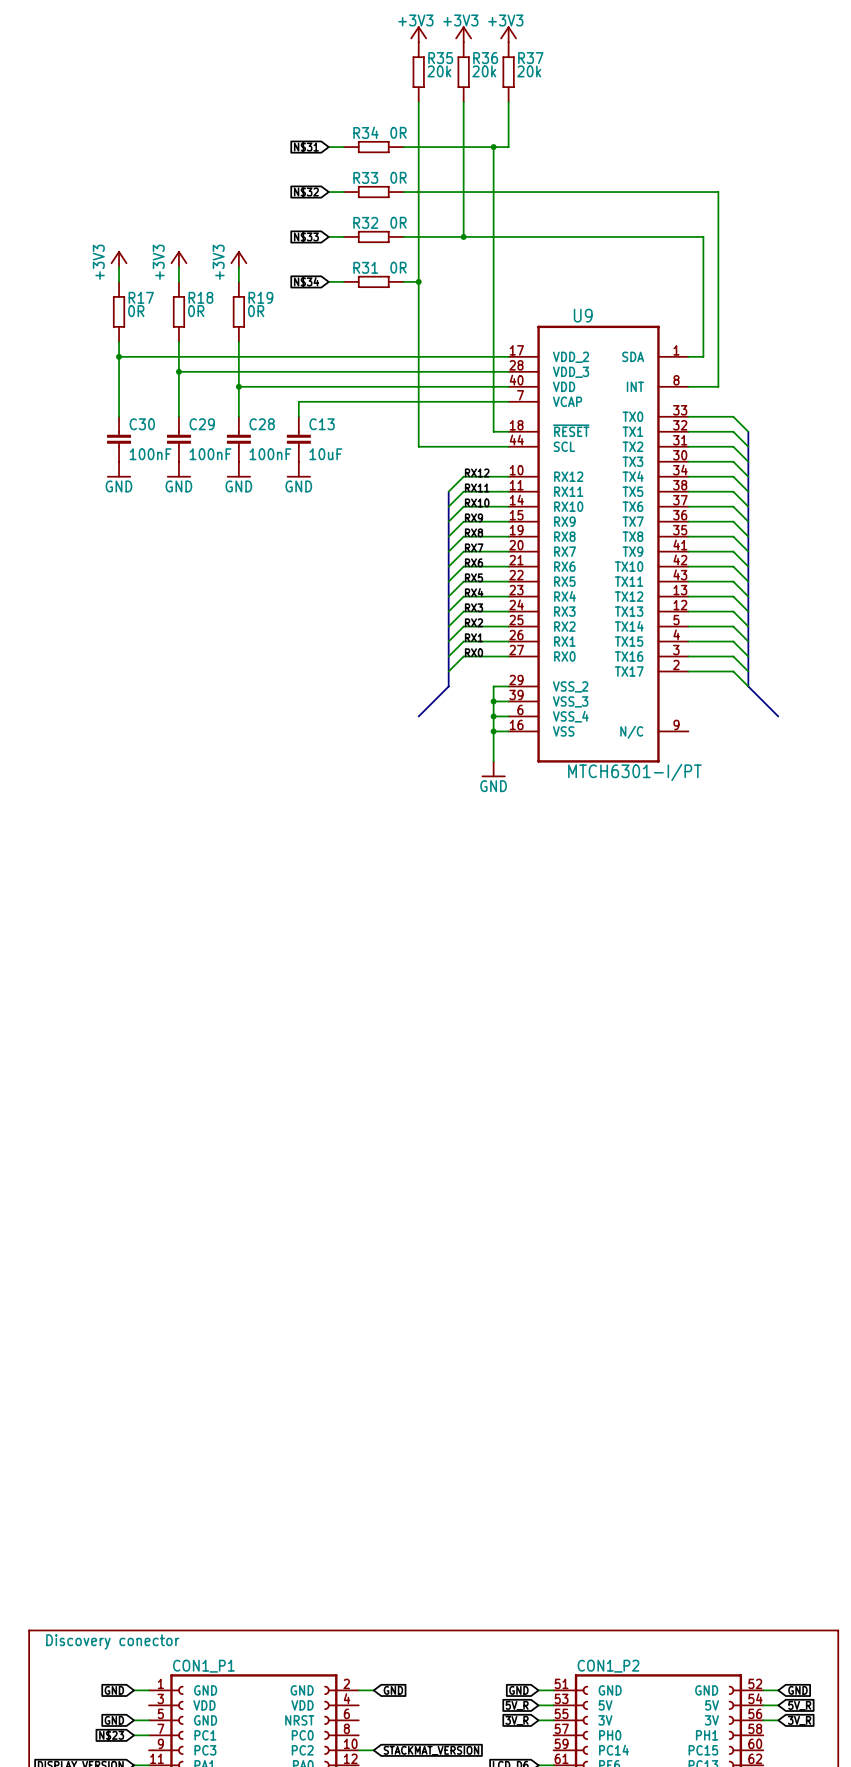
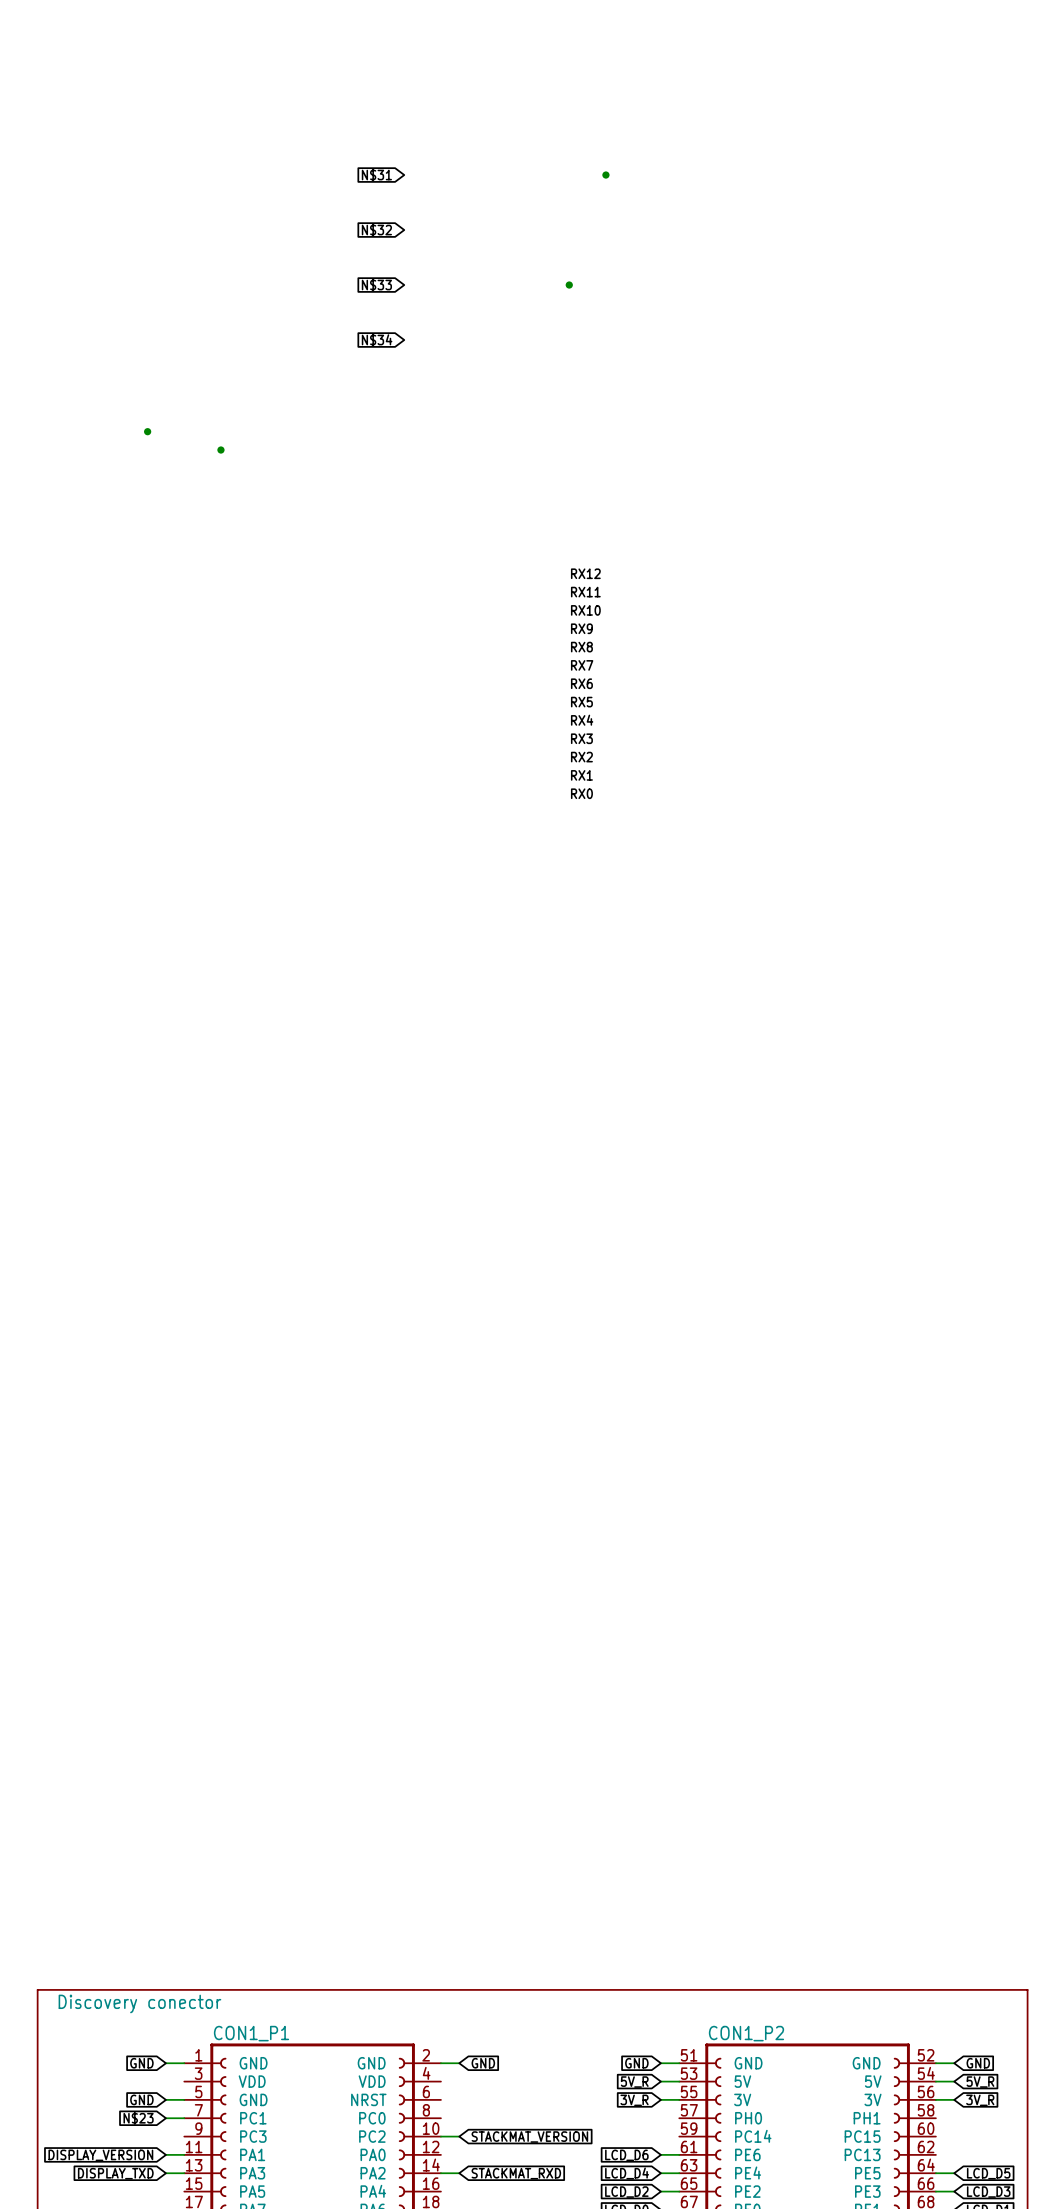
power symbol: +3V3 (418, 34) -> none
power symbol: +3V3 (463, 34) -> none
power symbol: +3V3 (508, 34) -> none
R35: 20k (418, 72) -> none
R36: 20k (463, 72) -> none
R37: 20k (508, 72) -> none
wire: (418, 102) (418, 446) (508, 446) -> none
wire: (463, 102) (463, 236) -> none
wire: (508, 102) (508, 147) (403, 147) -> none
wire: (328, 147) (343, 147) -> none
R34: 0R (373, 147) -> none
wire: (493, 147) (493, 431) (508, 431) -> none
wire: (328, 192) (343, 192) -> none
R33: 0R (373, 192) -> none
wire: (403, 192) (718, 192) (718, 386) (688, 386) -> none
wire: (328, 236) (343, 236) -> none
R32: 0R (373, 236) -> none
wire: (403, 236) (703, 236) (703, 356) (688, 356) -> none
power symbol: +3V3 (119, 259) -> none
power symbol: +3V3 (178, 259) -> none
power symbol: +3V3 (238, 259) -> none
wire: (119, 266) (119, 281) -> none
wire: (178, 266) (178, 281) -> none
wire: (238, 266) (238, 281) -> none
wire: (328, 281) (343, 281) -> none
R31: 0R (373, 281) -> none
wire: (403, 281) (418, 281) -> none
junction: (418, 281) -> none
R17: 0R (119, 311) -> none
R18: 0R (178, 311) -> none
R19: 0R (238, 311) -> none
wire: (119, 341) (119, 416) -> none
wire: (178, 341) (178, 416) -> none
wire: (238, 341) (238, 416) -> none
wire: (119, 356) (508, 356) -> none
wire: (178, 371) (508, 371) -> none
wire: (238, 386) (508, 386) -> none
junction: (238, 386) -> none
wire: (508, 401) (298, 401) (298, 416) -> none
wire: (688, 416) (733, 416) (748, 431) -> none
wire: (688, 431) (733, 431) (748, 446) -> none
bus: (748, 431) (748, 686) (778, 716) -> none
C30: 100nF (119, 439) -> none
C29: 100nF (178, 439) -> none
C28: 100nF (238, 439) -> none
C13: 10uF (298, 439) -> none
wire: (688, 446) (733, 446) (748, 461) -> none
wire: (688, 461) (733, 461) (748, 476) -> none
power symbol: GND (119, 469) -> none
power symbol: GND (178, 469) -> none
power symbol: GND (238, 469) -> none
power symbol: GND (298, 469) -> none
wire: (508, 476) (463, 476) (448, 491) -> none
wire: (688, 476) (733, 476) (748, 491) -> none
bus: (448, 491) (448, 686) (418, 716) -> none
wire: (508, 491) (463, 491) (448, 506) -> none
wire: (688, 491) (733, 491) (748, 506) -> none
wire: (508, 506) (463, 506) (448, 521) -> none
wire: (688, 506) (733, 506) (748, 521) -> none
wire: (508, 521) (463, 521) (448, 536) -> none
wire: (688, 521) (733, 521) (748, 536) -> none
wire: (508, 536) (463, 536) (448, 551) -> none
wire: (688, 536) (733, 536) (748, 551) -> none
U9: MTCH6301-I/PT (598, 544) -> none
wire: (508, 551) (463, 551) (448, 566) -> none
wire: (688, 551) (733, 551) (748, 566) -> none
wire: (508, 566) (463, 566) (448, 581) -> none
wire: (688, 566) (733, 566) (748, 581) -> none
wire: (508, 581) (463, 581) (448, 596) -> none
wire: (688, 581) (733, 581) (748, 596) -> none
wire: (508, 596) (463, 596) (448, 611) -> none
wire: (688, 596) (733, 596) (748, 611) -> none
wire: (508, 611) (463, 611) (448, 626) -> none
wire: (688, 611) (733, 611) (748, 626) -> none
wire: (508, 626) (463, 626) (448, 641) -> none
wire: (688, 626) (733, 626) (748, 641) -> none
wire: (508, 641) (463, 641) (448, 656) -> none
wire: (688, 641) (733, 641) (748, 656) -> none
wire: (508, 656) (463, 656) (448, 671) -> none
wire: (688, 656) (733, 656) (748, 671) -> none
wire: (688, 671) (733, 671) (748, 686) -> none
wire: (508, 686) (493, 686) (493, 761) -> none
wire: (493, 701) (508, 701) -> none
junction: (493, 701) -> none
wire: (493, 716) (508, 716) -> none
junction: (493, 716) -> none
wire: (493, 731) (508, 731) -> none
junction: (493, 731) -> none
power symbol: GND (493, 769) -> none

